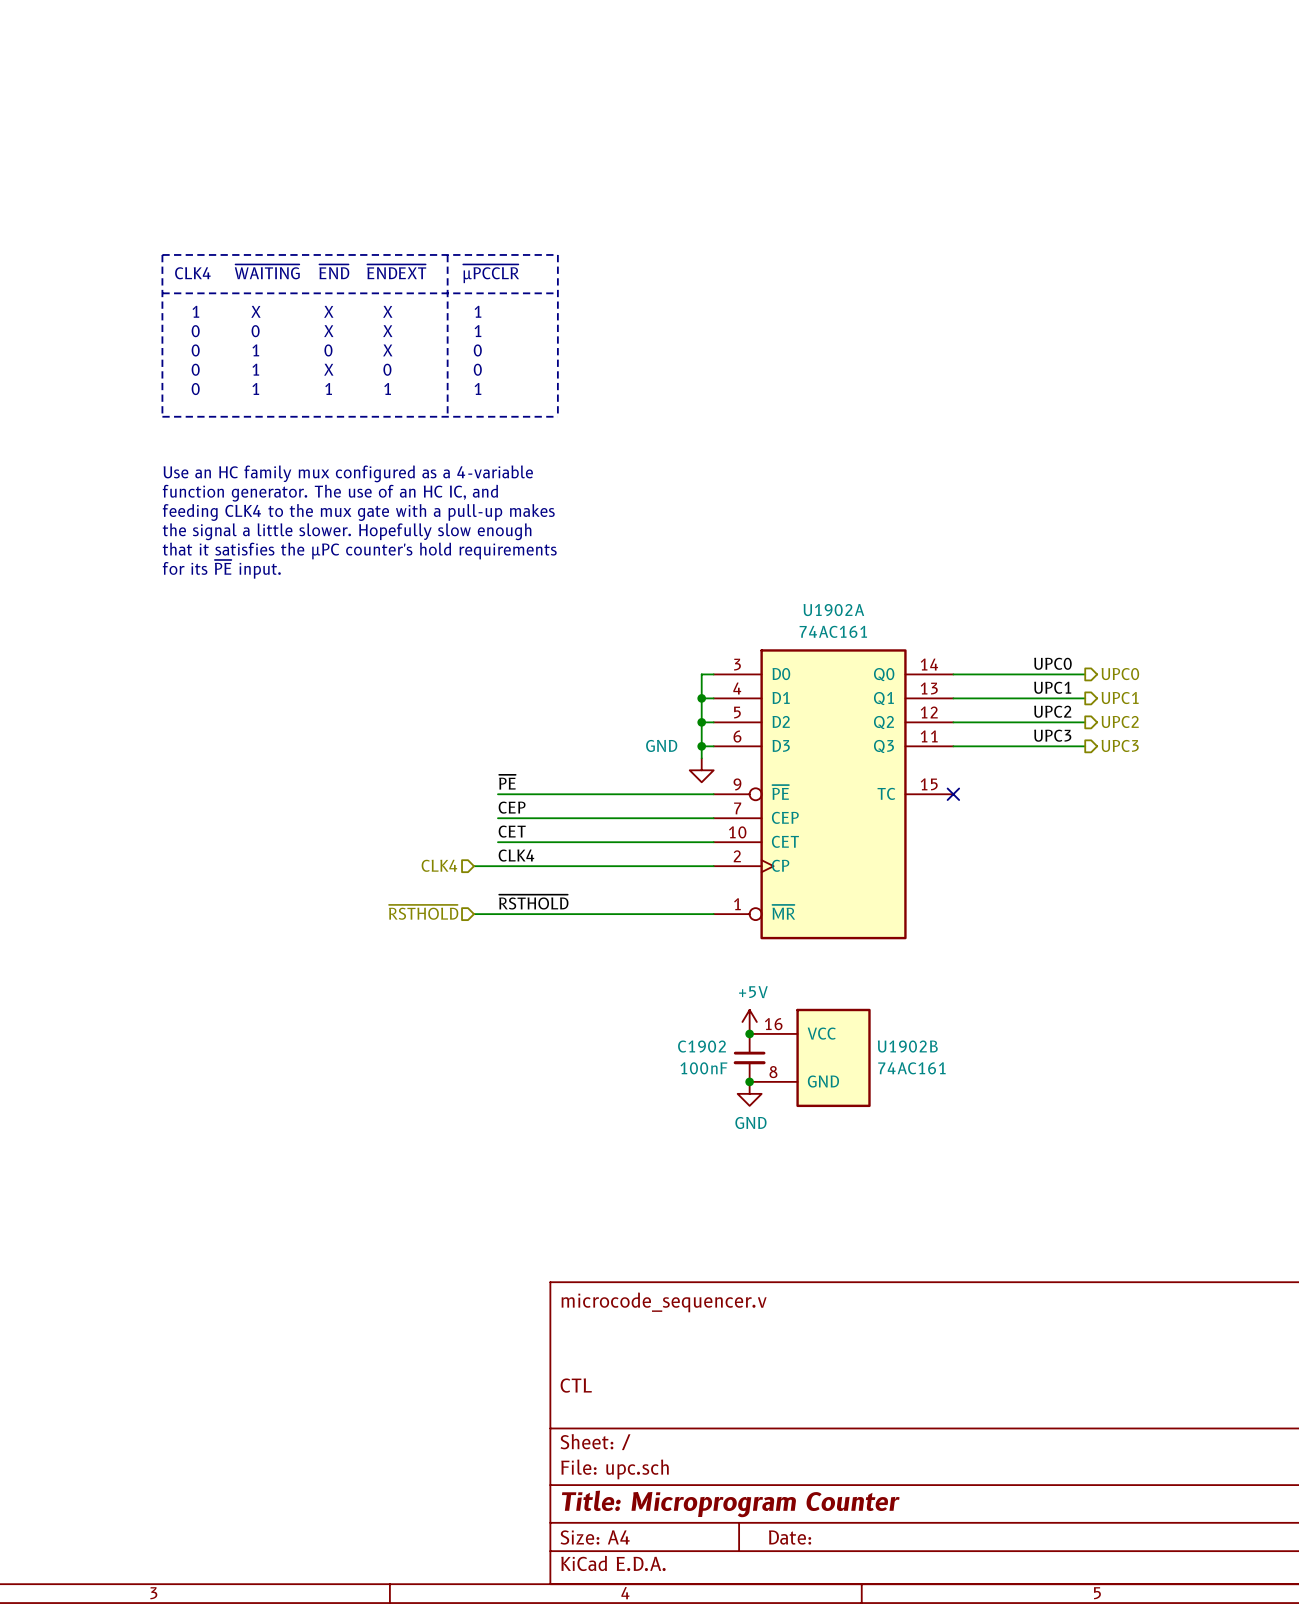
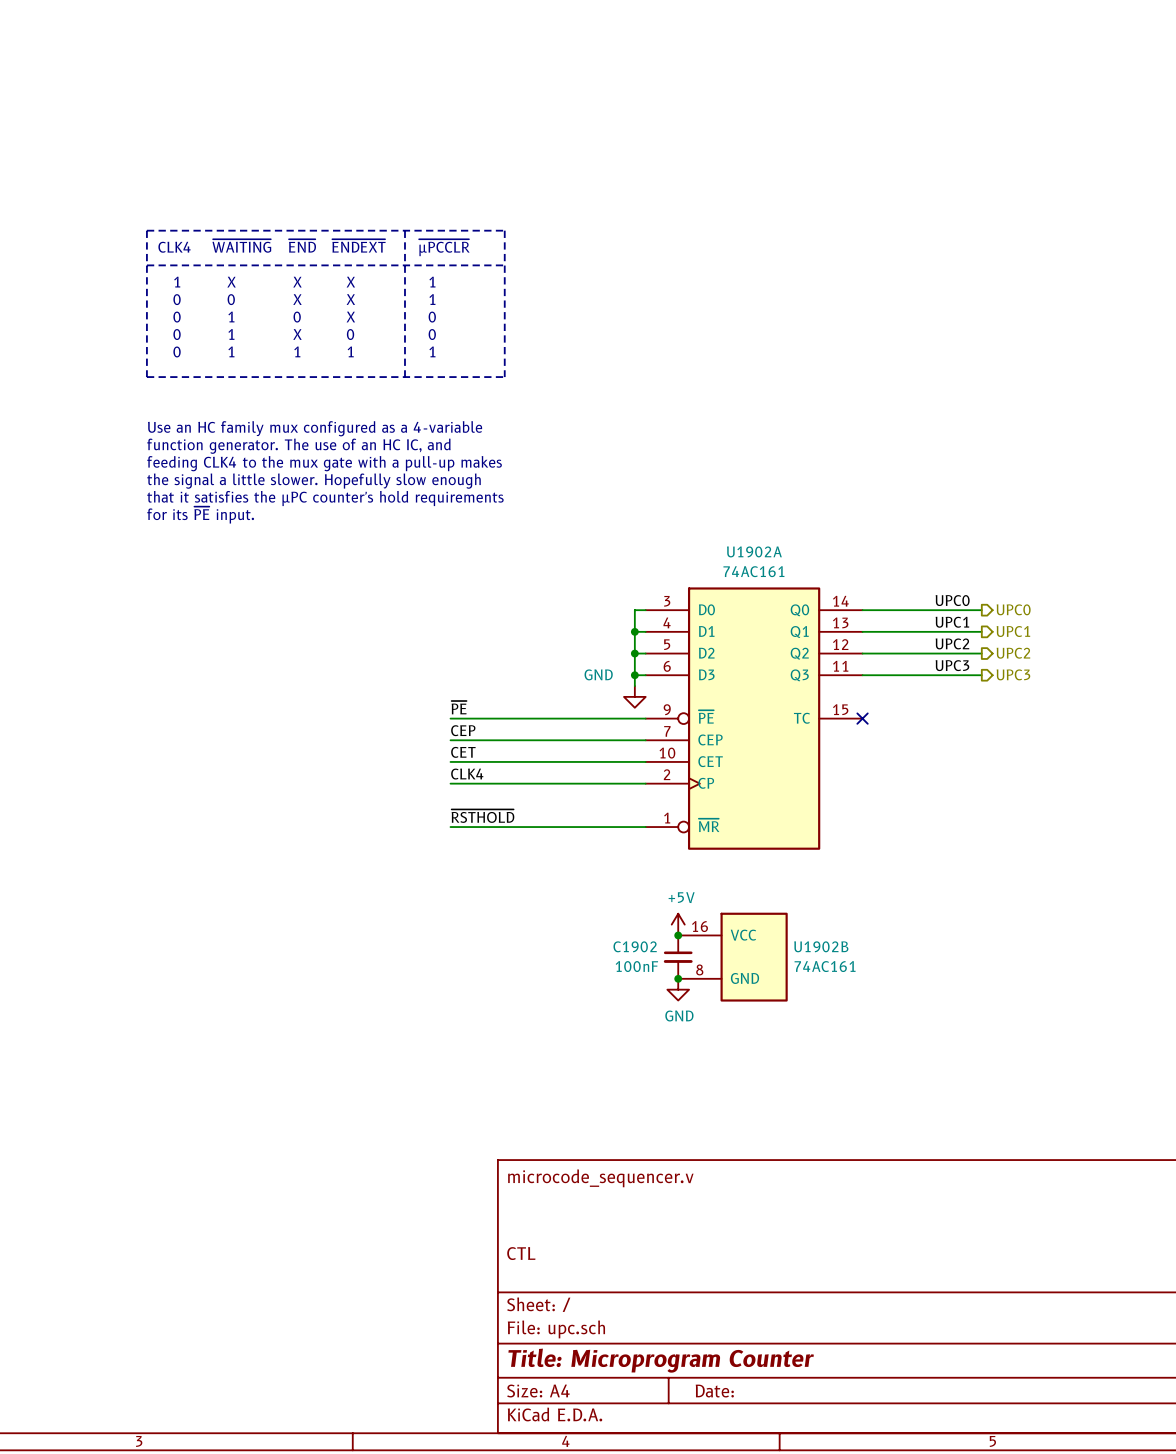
hierarchical label: CLK4 (439, 865) -> none
wire: (474, 866) (497, 866) -> none
hierarchical label: ~{RSTHOLD} (423, 912) -> none
wire: (474, 914) (497, 914) -> none

